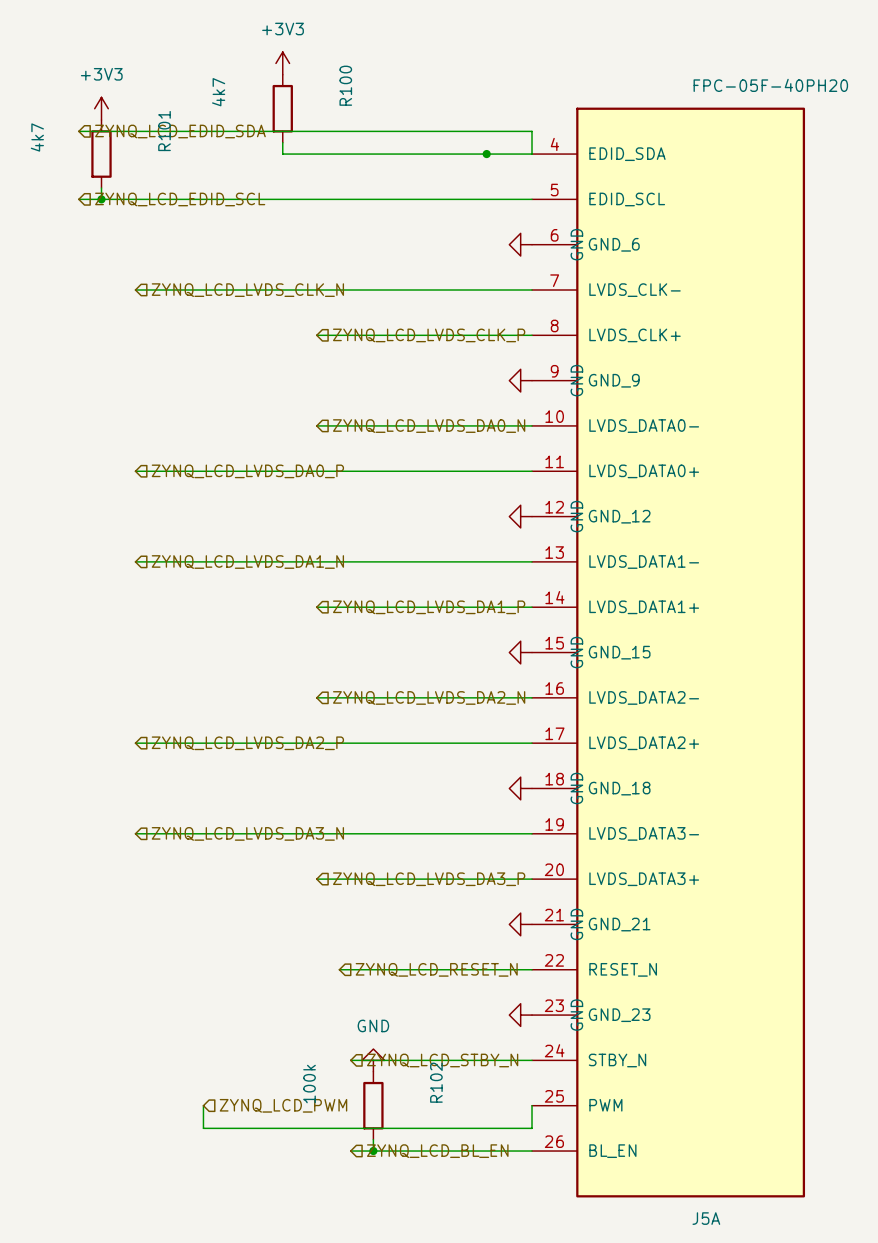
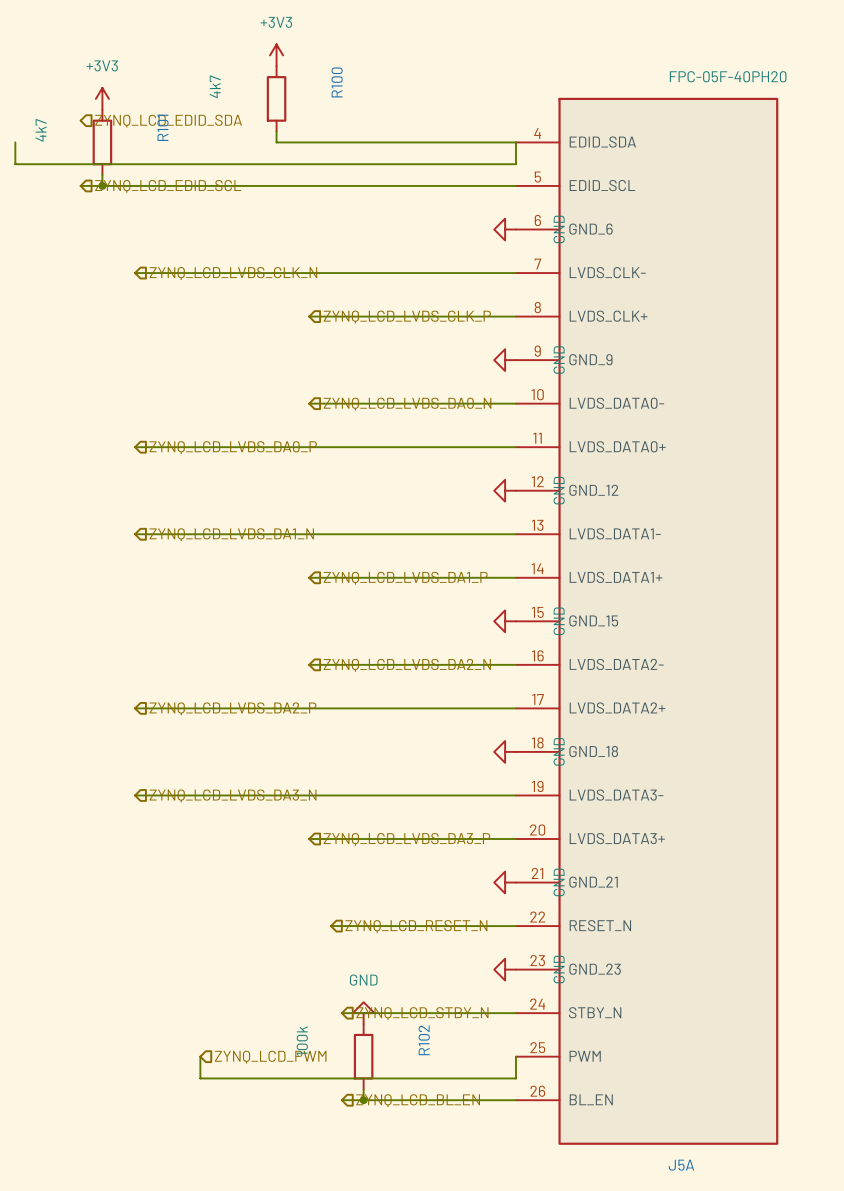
wire: (78, 131) (532, 131) (532, 154) -> (15, 142) (15, 164) (516, 164) (516, 142)
junction: (486, 154) -> none

